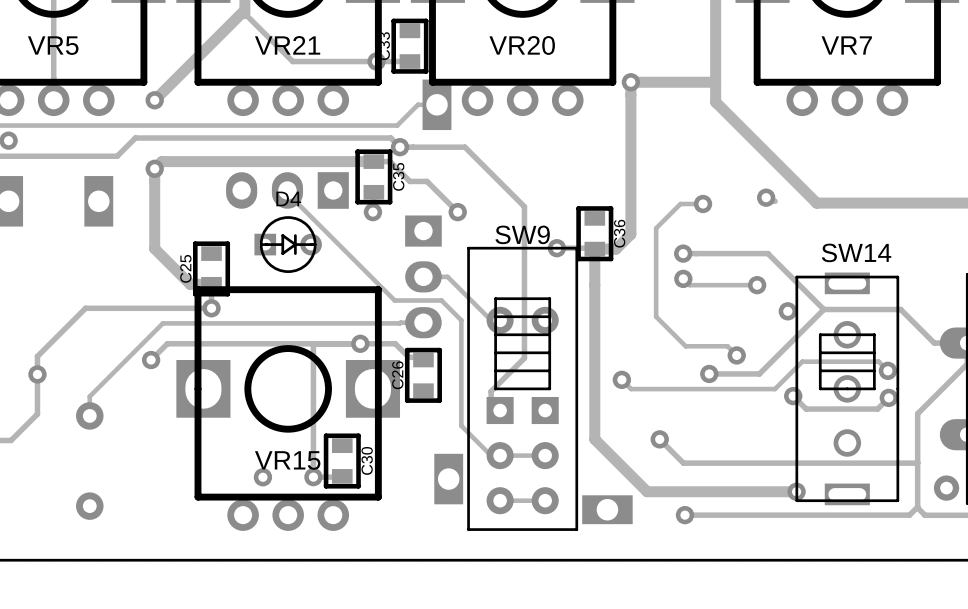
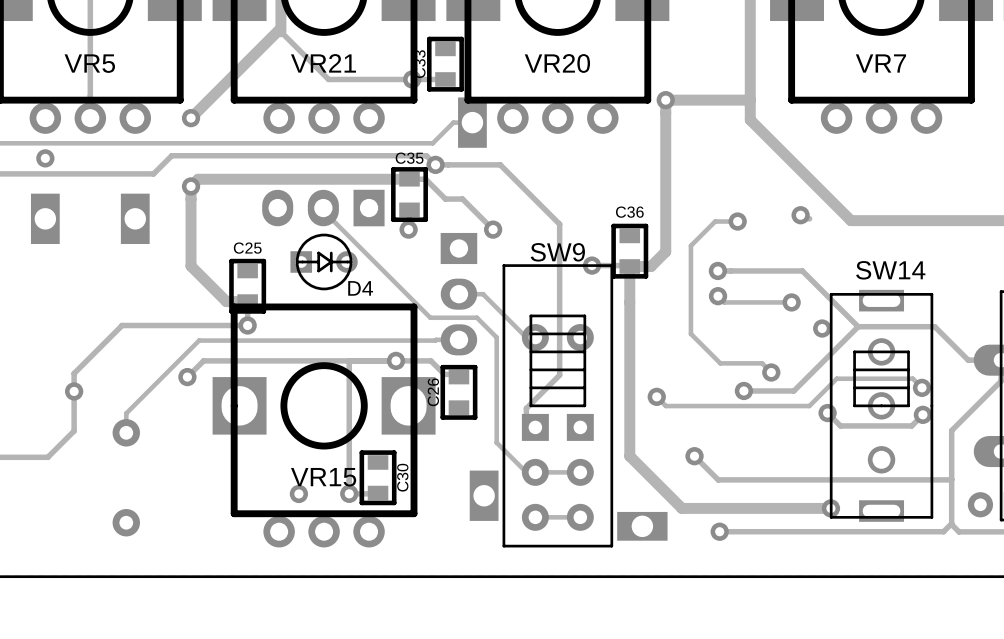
C35 name rotation: 0° (398, 176) -> 90° clockwise (409, 158)
C35 name position: C35 (398, 176) -> C35 (409, 158)
D4 name position: D4 (288, 198) -> D4 (360, 288)
C36 name rotation: 0° (619, 233) -> 90° clockwise (629, 212)
C36 name position: C36 (619, 233) -> C36 (629, 212)
C25 name rotation: 0° (185, 268) -> 90° clockwise (247, 248)
C25 name position: C25 (185, 268) -> C25 (247, 248)

